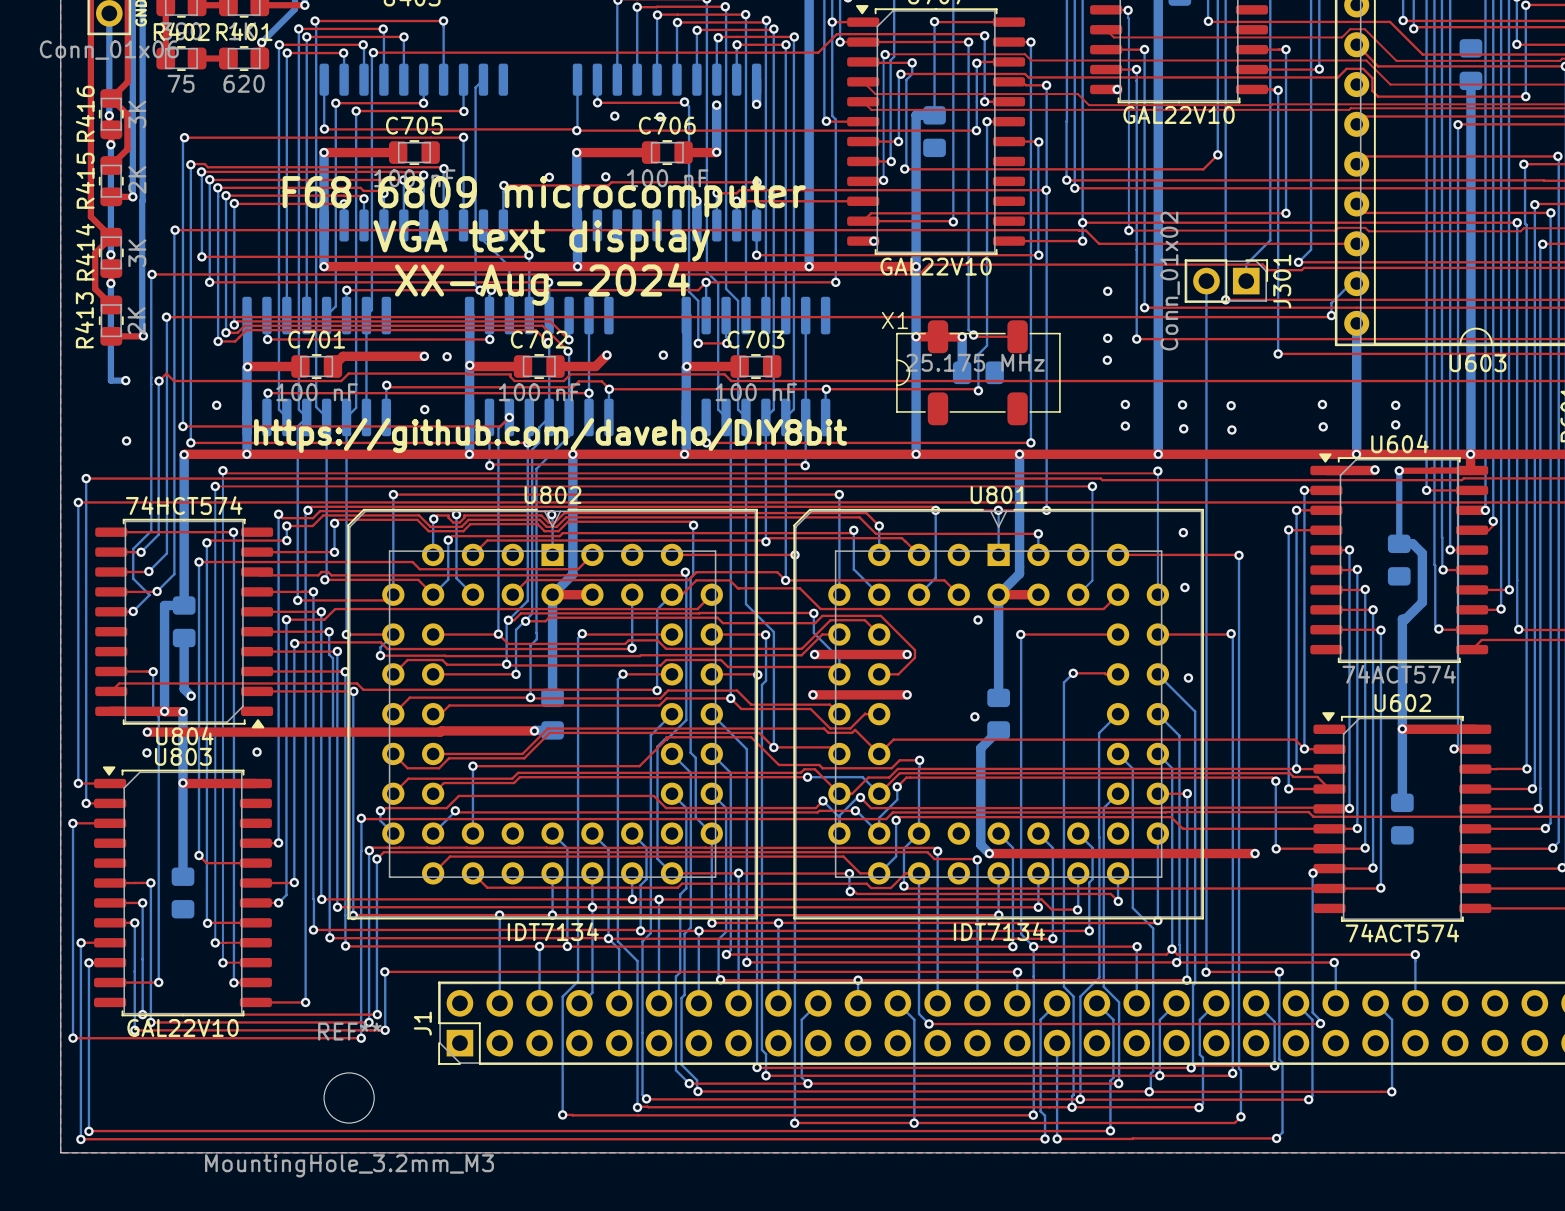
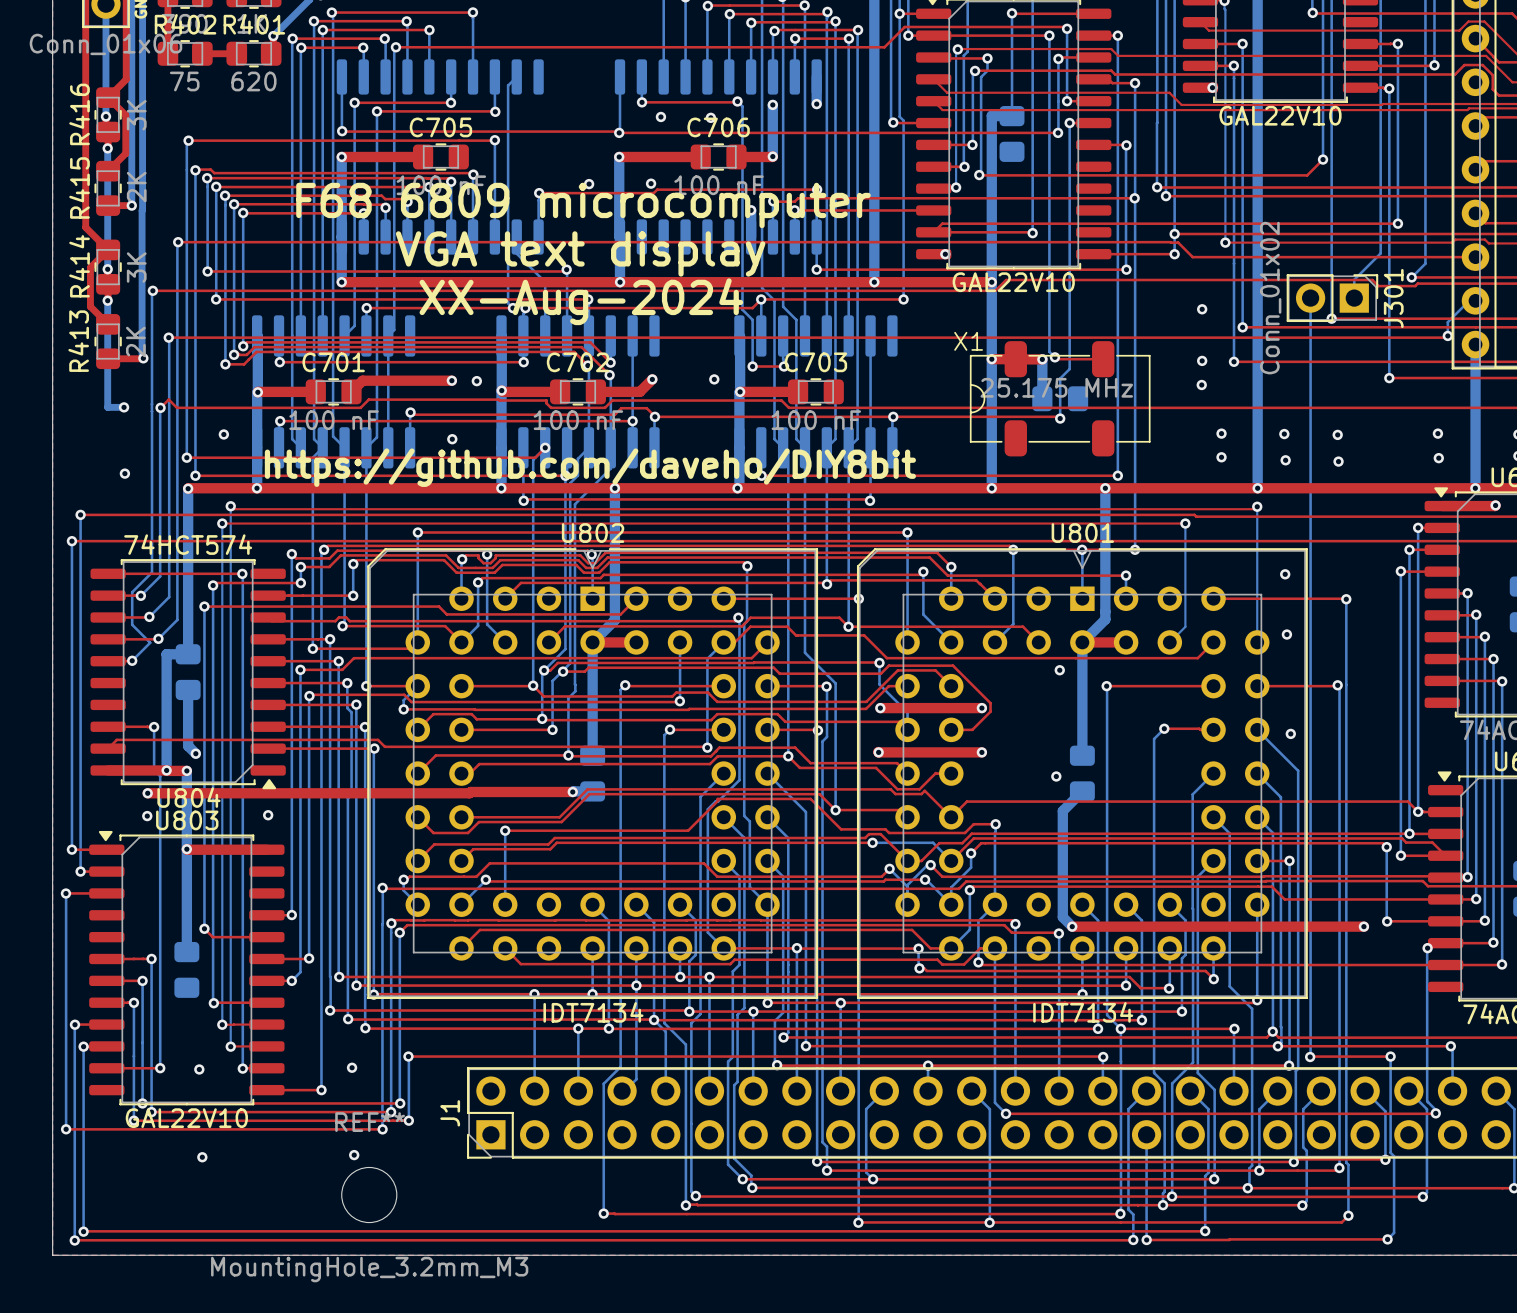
via: none -> (352, 1067)
via: none -> (199, 1069)
via: none -> (354, 1155)
via: none -> (202, 1157)

